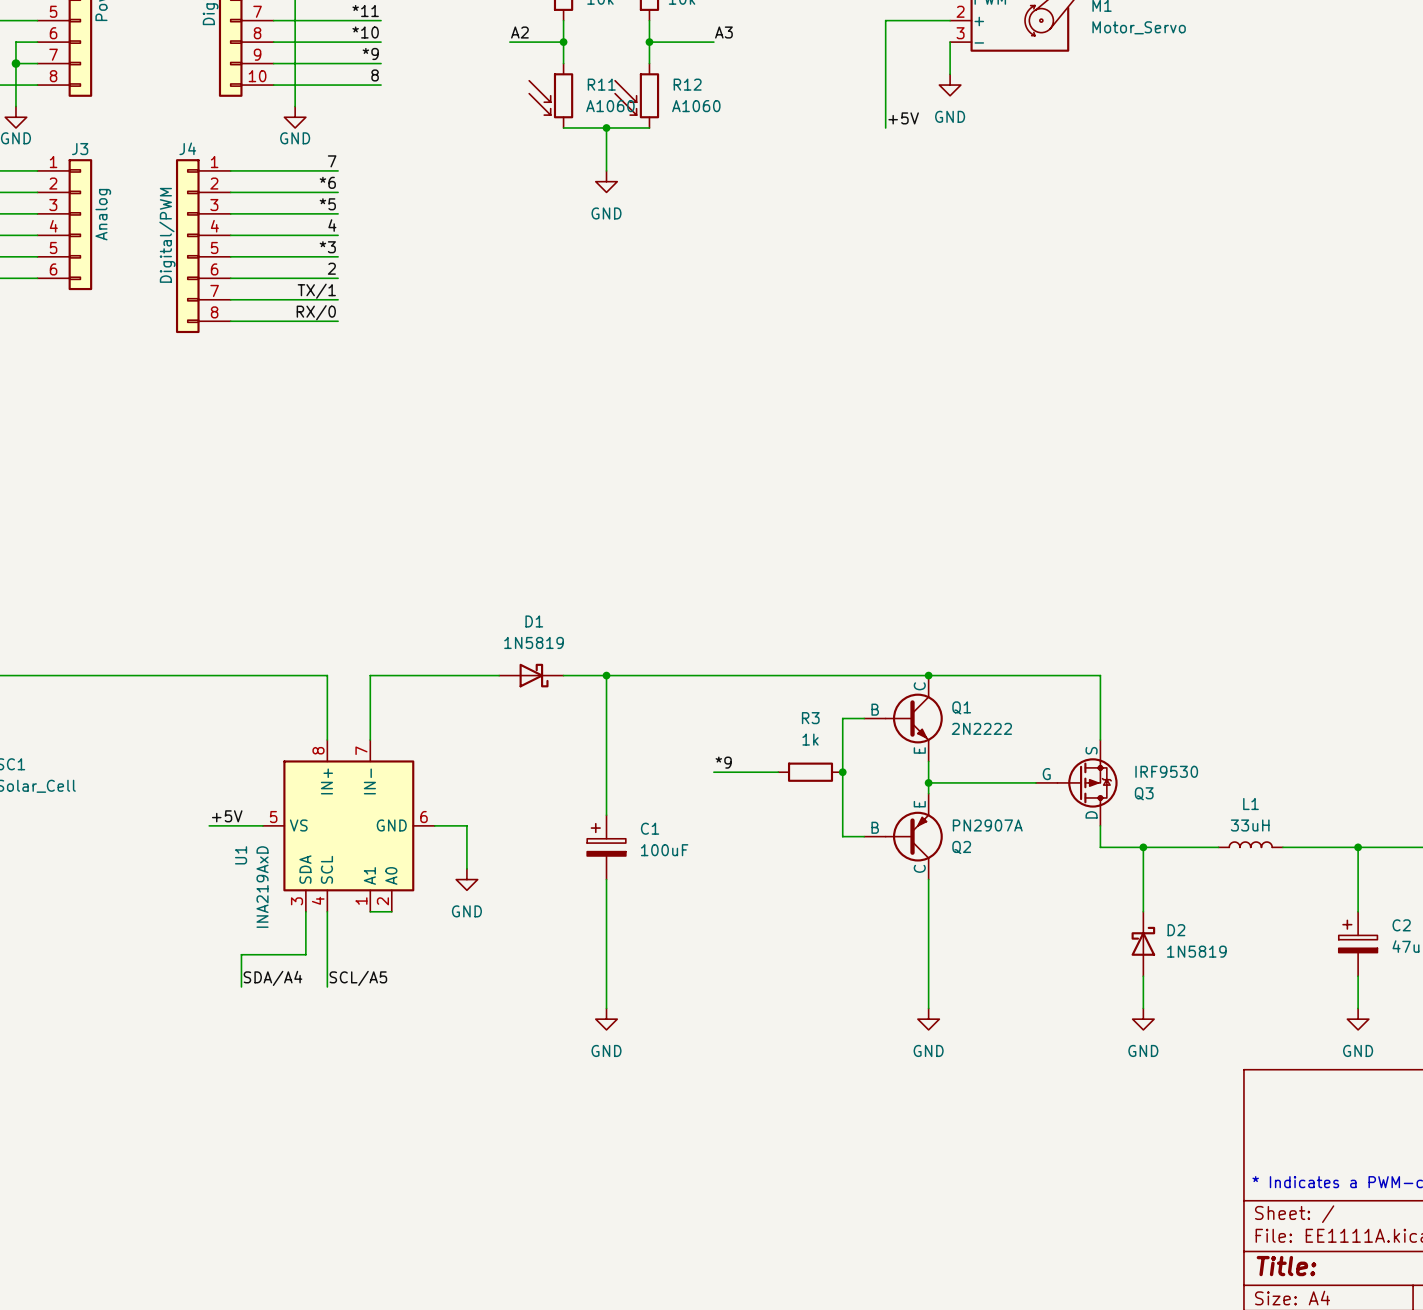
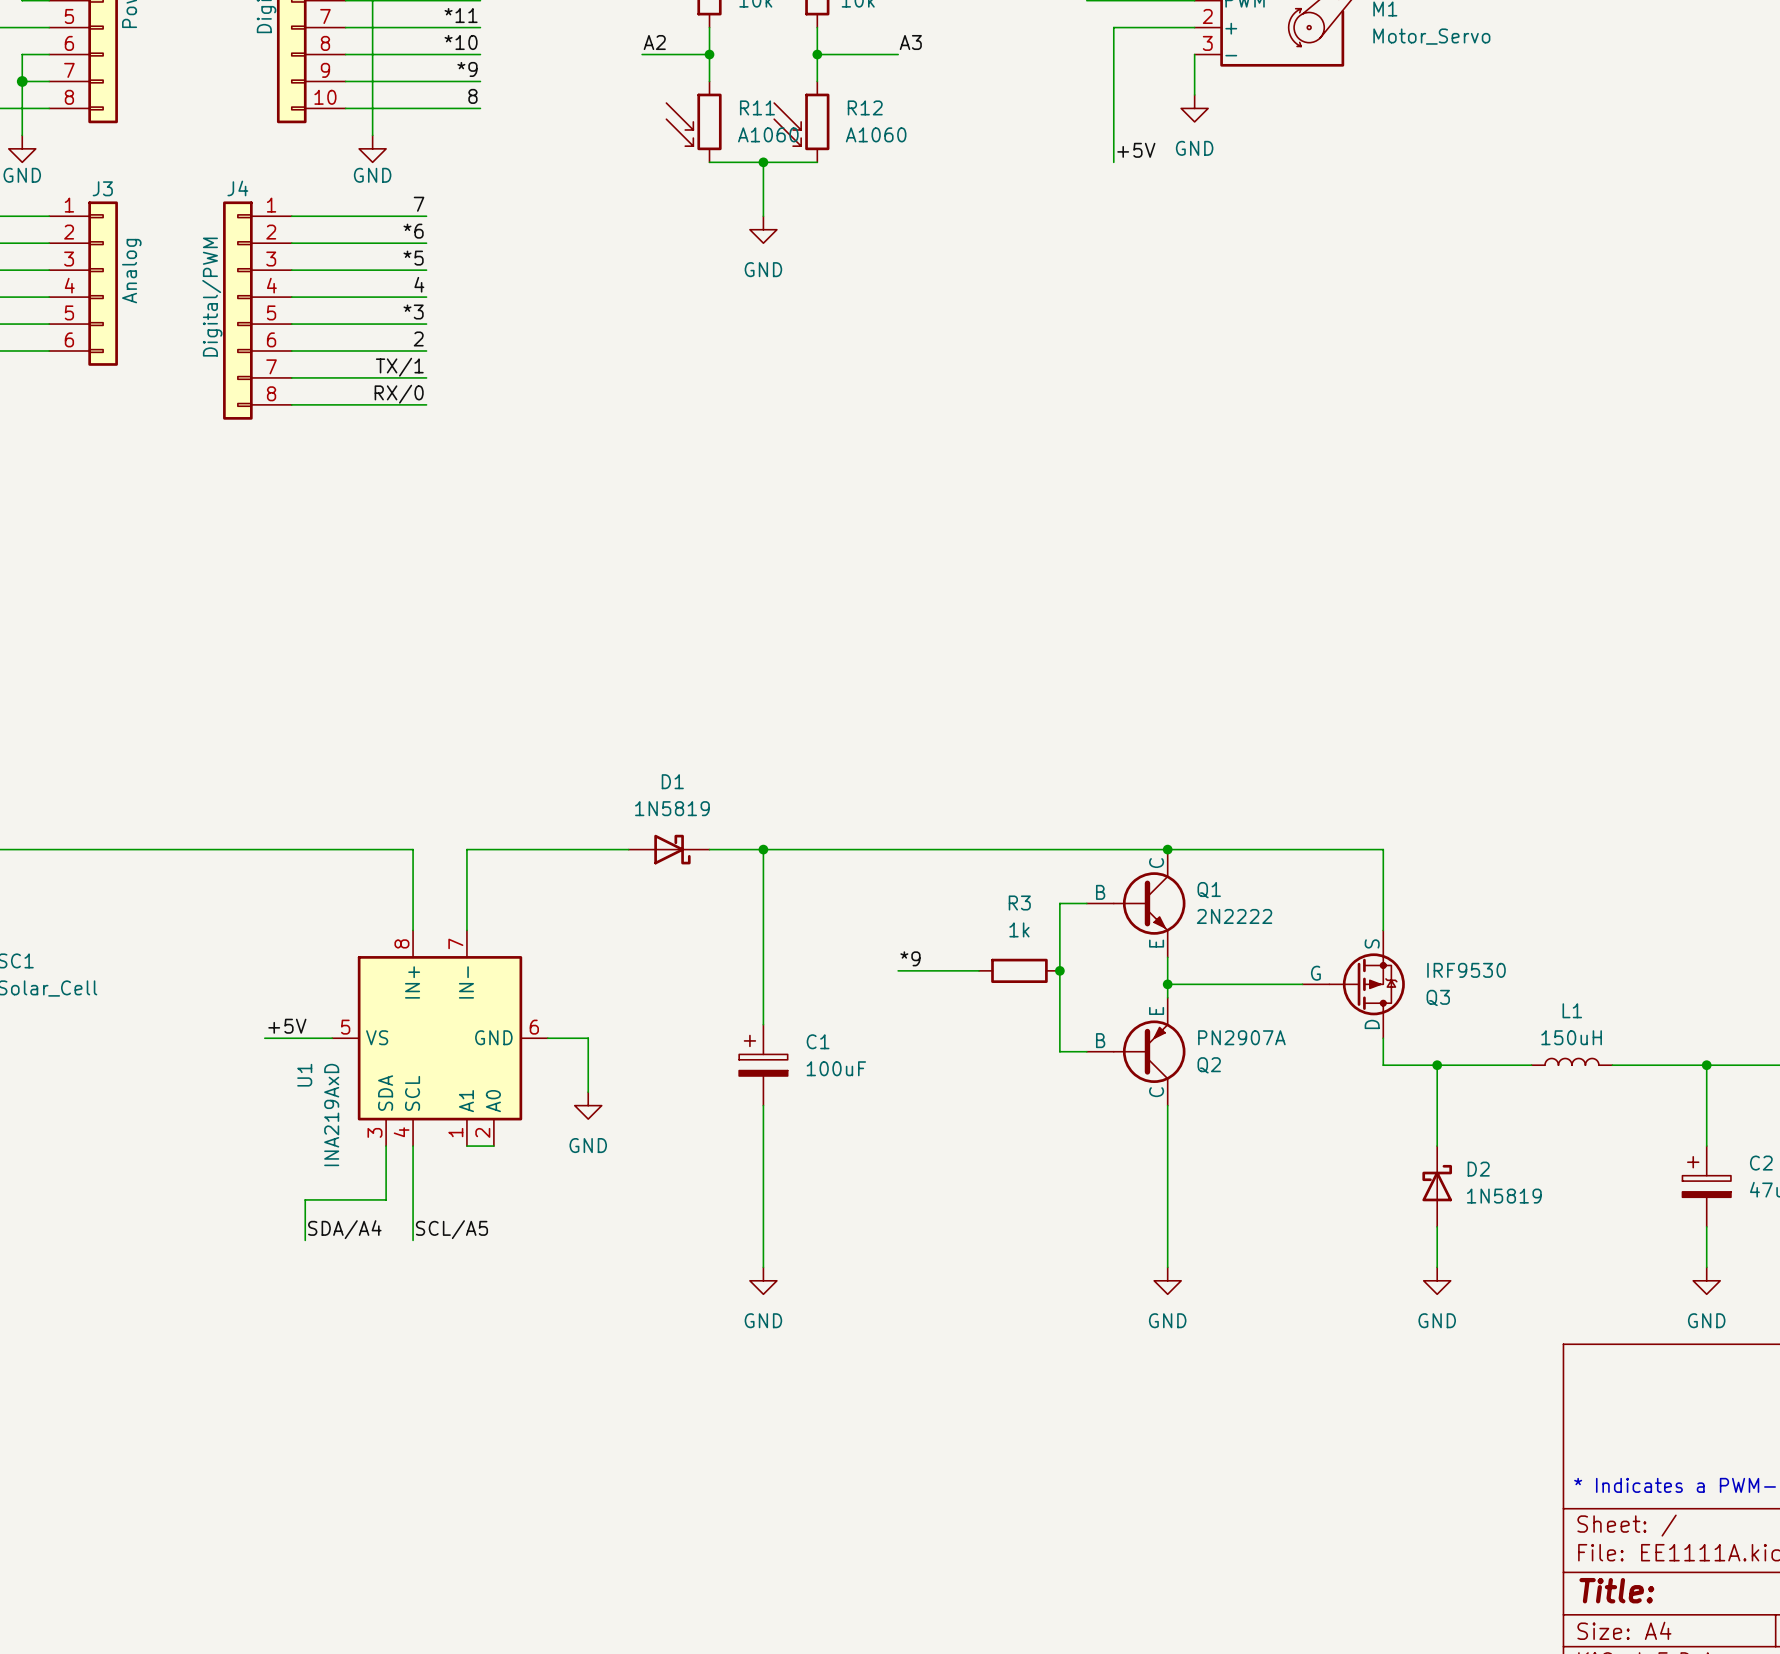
L1 value: 33uH (1250, 825) -> 150uH (1571, 1037)

